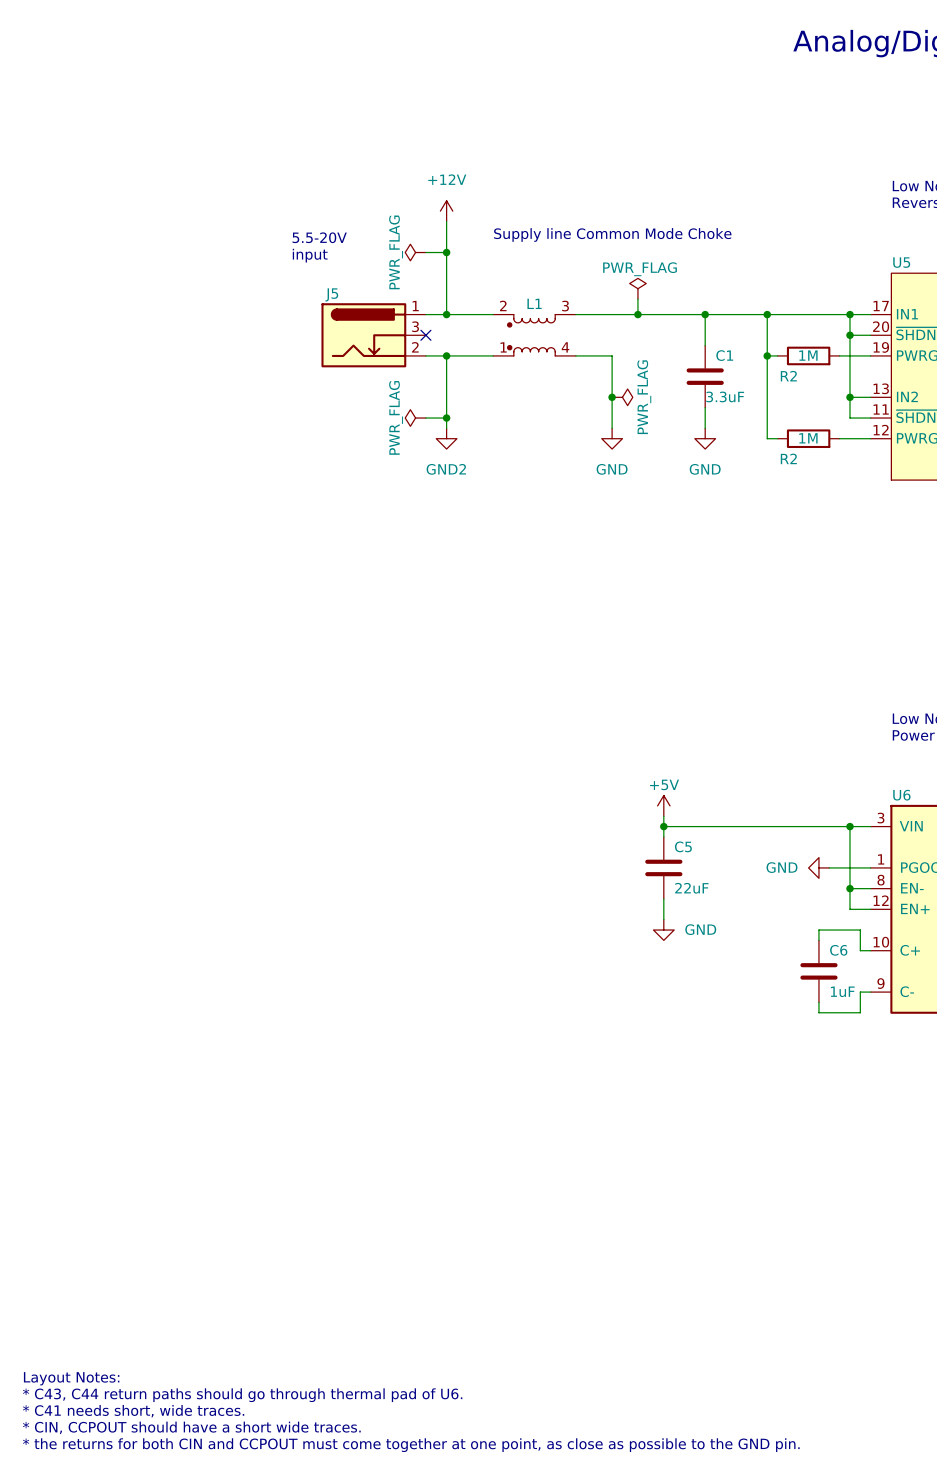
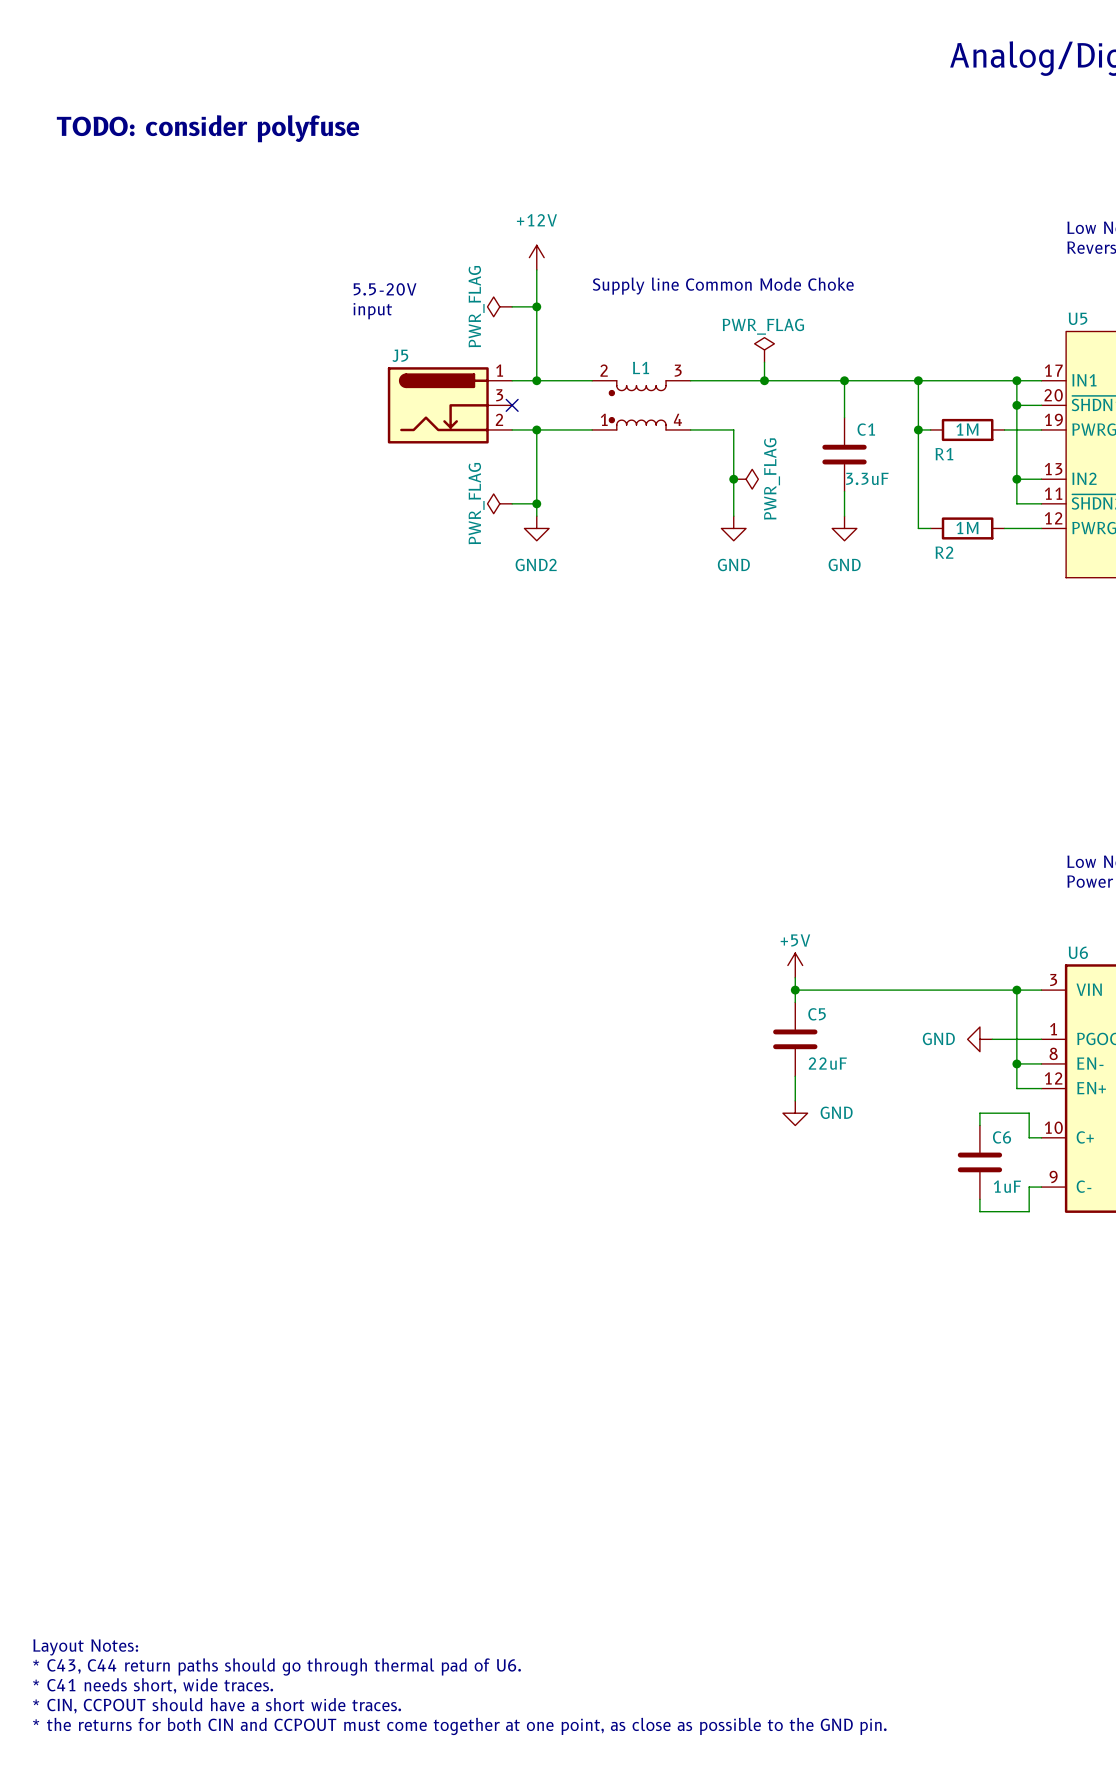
text: none -> TODO: consider polyfuse (207, 128)
R2 name: R2 (788, 376) -> R1 (944, 454)

